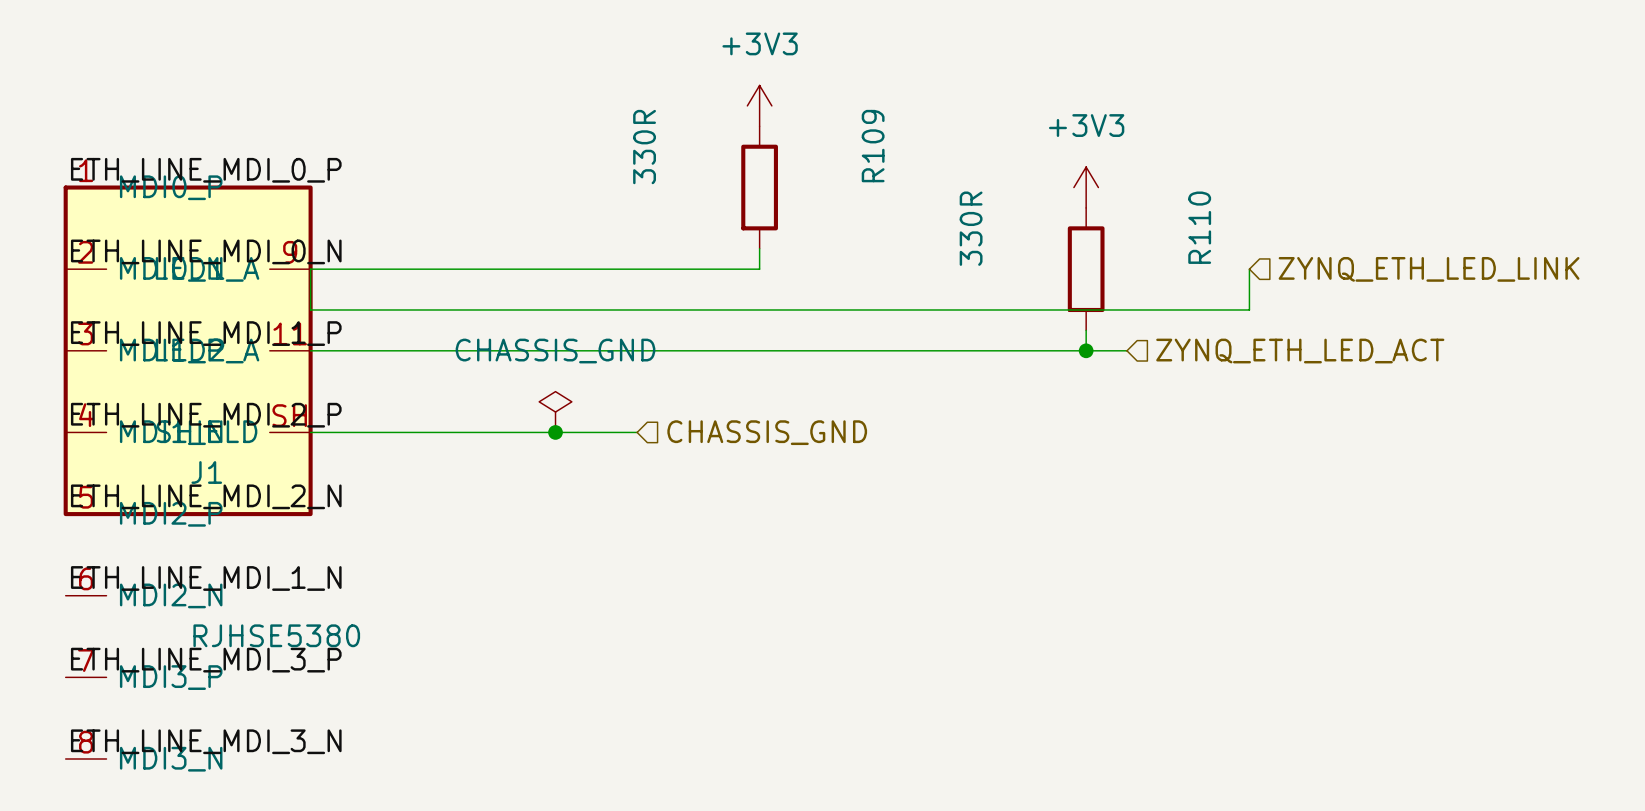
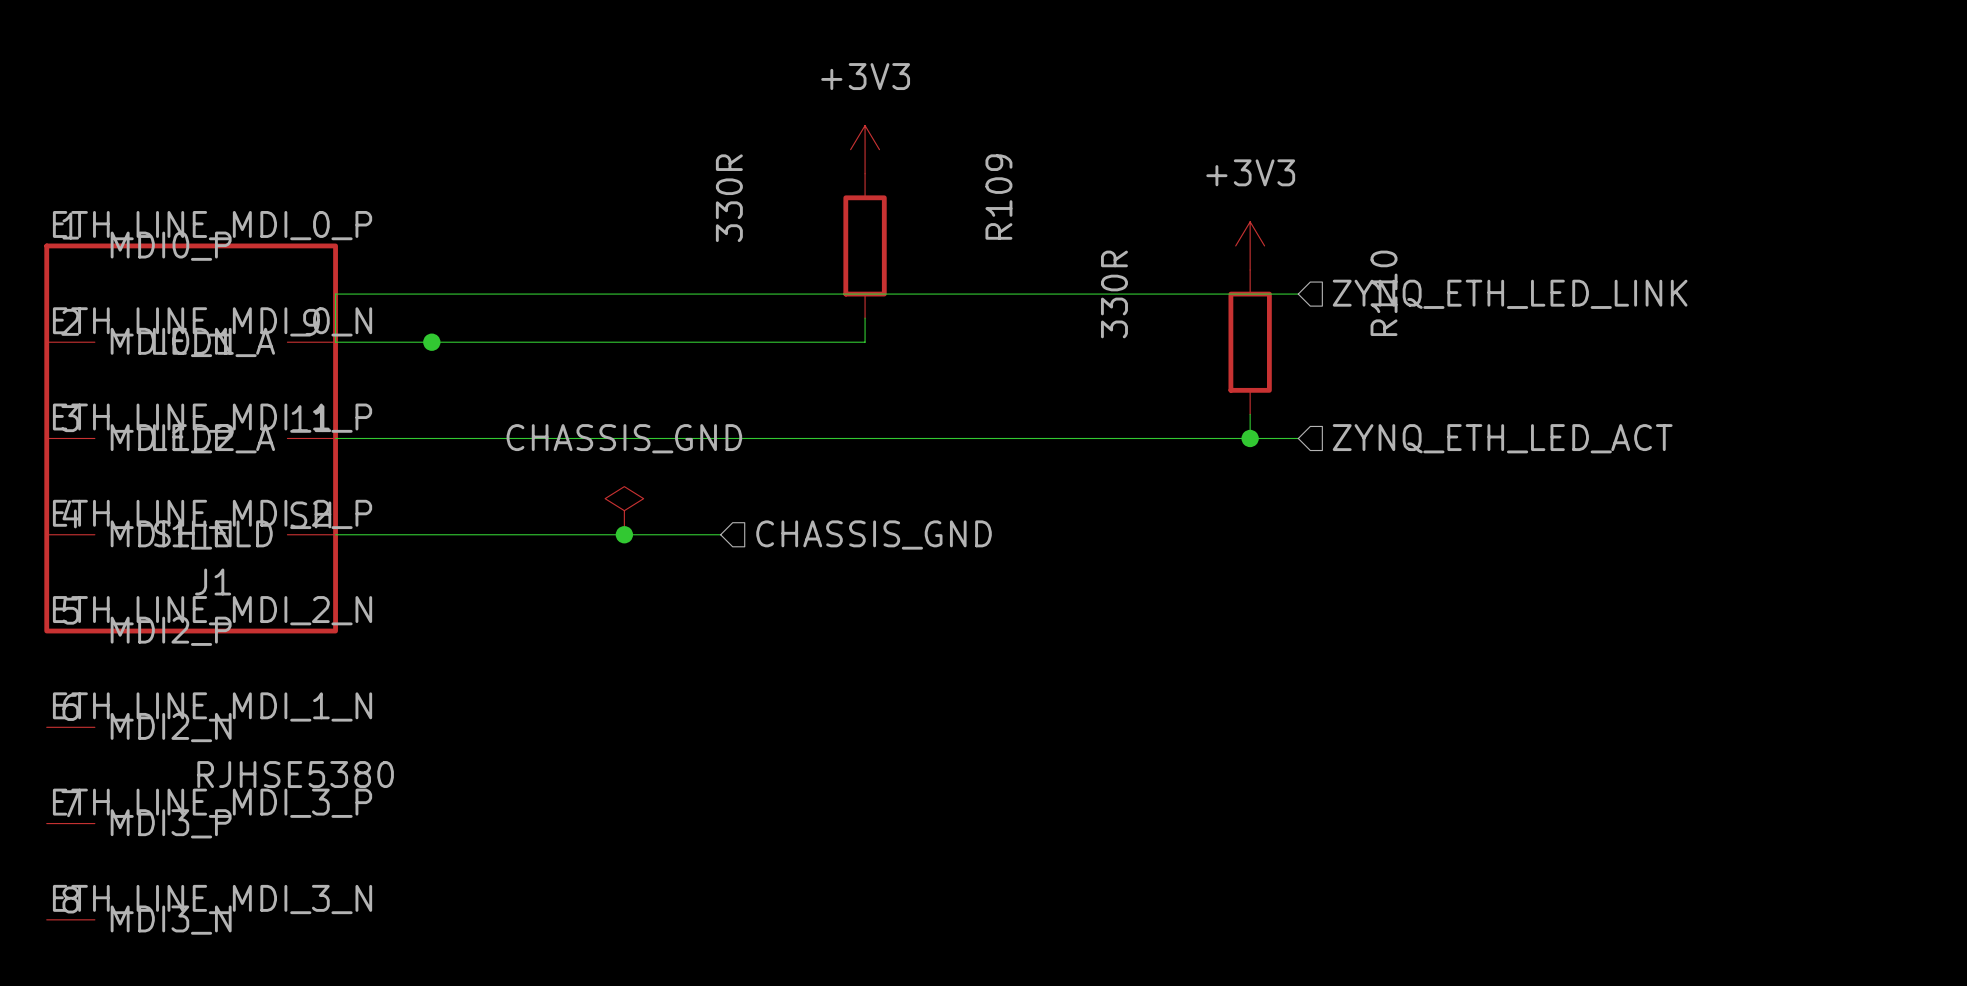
wire: (310, 269) (310, 309) (1249, 309) (1249, 269) -> (335, 342) (335, 294) (1298, 294)
junction: none -> (431, 342)
hierarchical label position: ZYNQ_ETH_LED_LINK (1429, 269) -> ZYNQ_ETH_LED_LINK (1510, 294)

